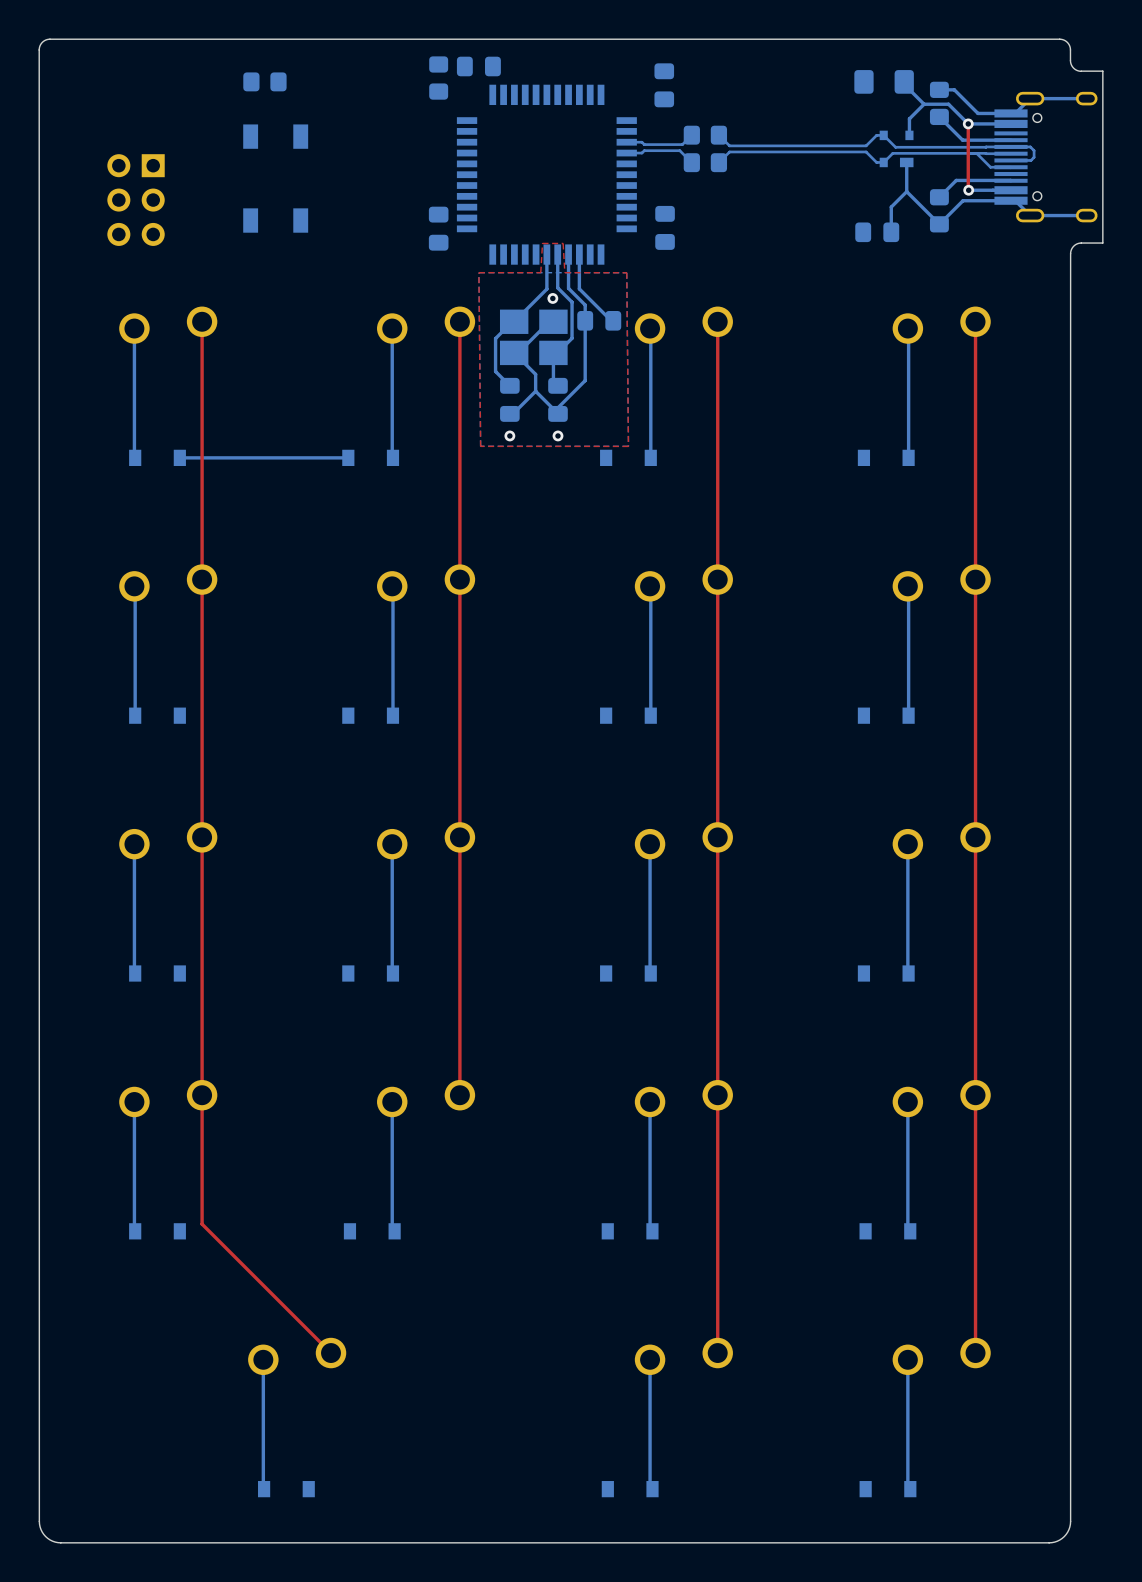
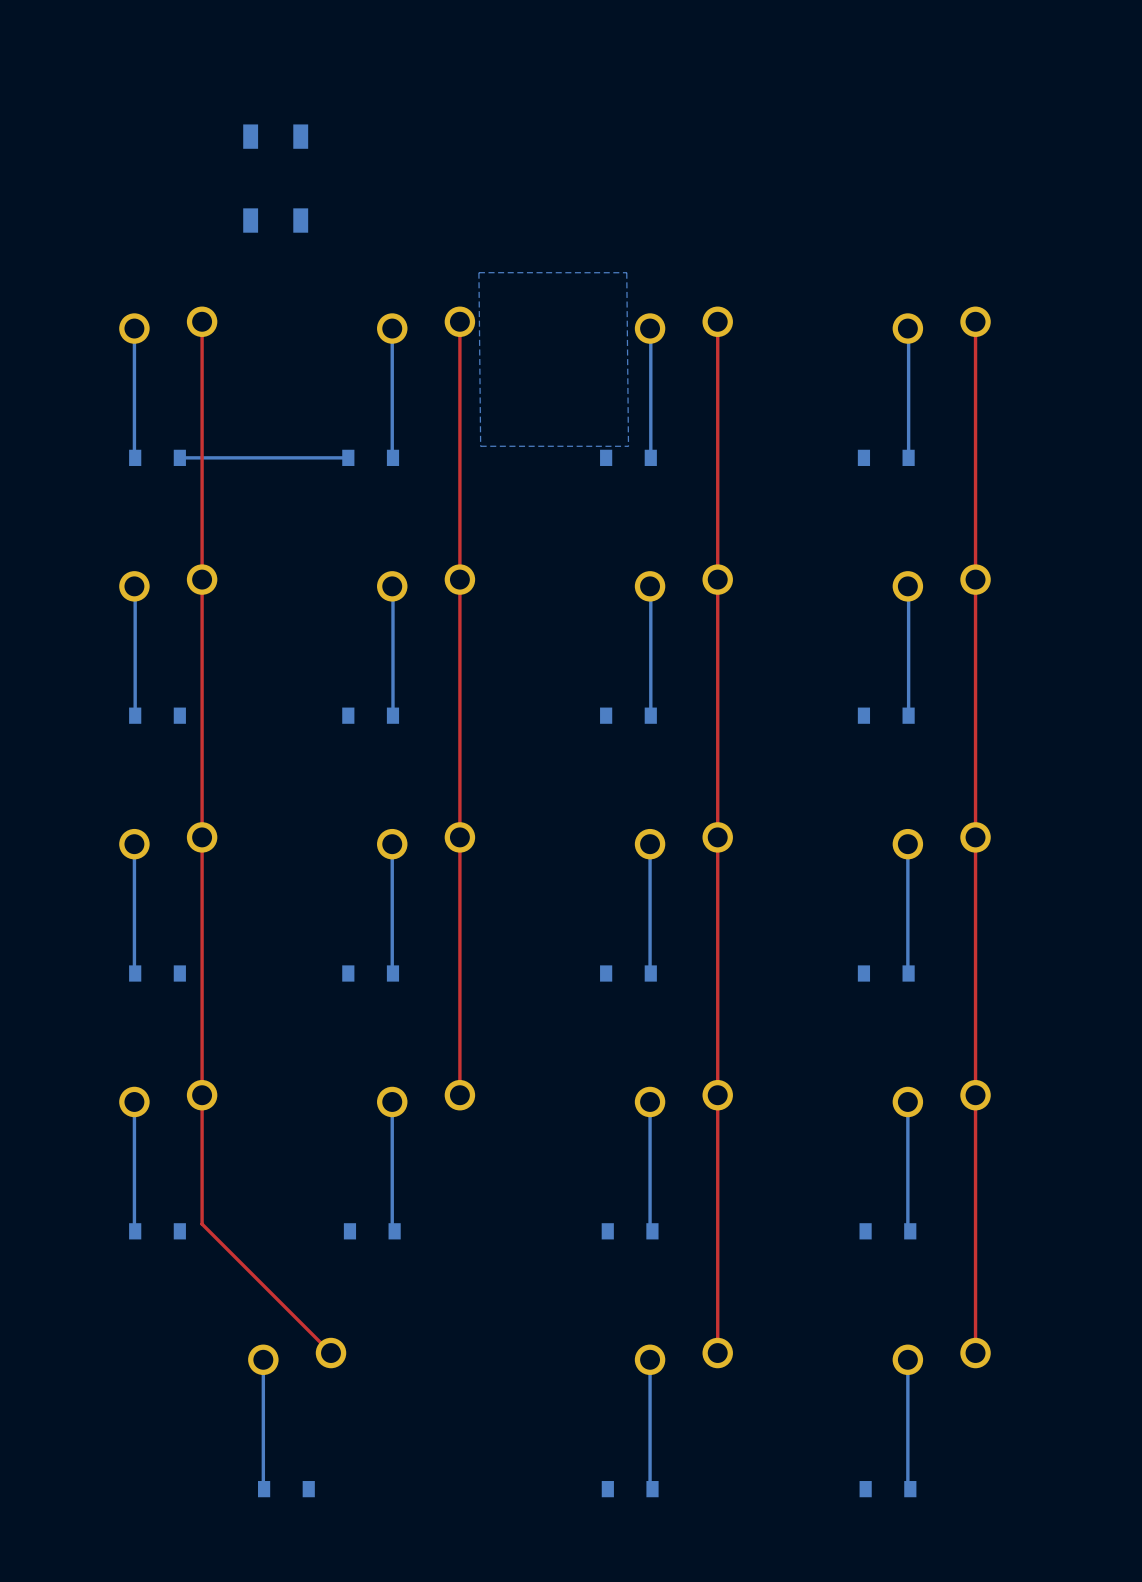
part: (478, 66) -> none
board edge: (1081, 71) (1102, 71) (1102, 243) (1078, 243) (1072, 247) (1070, 253) (1070, 1521) (1066, 1534) (1059, 1539) (1049, 1542) (60, 1542) (47, 1538) (40, 1529) (39, 1521) (39, 49) (41, 43) (49, 39) (1059, 39) (1066, 41) (1069, 45) (1072, 67) (1081, 71) -> none
part: (438, 78) -> none
part: (264, 81) -> none
part: (884, 81) -> none
bottom track: (904, 81) (904, 84) (924, 104) -> none
part: (664, 85) -> none
bottom track: (939, 89) (954, 89) (977, 113) (1015, 113) (1030, 98) (1086, 98) -> none
part: (939, 103) -> none
bottom track: (924, 104) (909, 118) (909, 135) -> none
bottom track: (924, 104) (948, 104) (968, 123) (1011, 123) -> none
bottom track: (939, 116) (962, 140) (1011, 140) -> none
top track: (968, 123) (968, 190) -> none
via: (968, 123) -> none
bottom track: (691, 135) (682, 144) (644, 144) (641, 142) (626, 142) -> none
part: (705, 135) -> none
bottom track: (718, 135) (729, 145) (866, 145) (876, 135) (883, 135) -> none
bottom track: (883, 135) (895, 147) (1030, 146) (1034, 150) (1034, 157) (1030, 160) (1011, 160) -> none
part: (896, 148) -> none
bottom track: (626, 153) (641, 153) (644, 150) (679, 150) (691, 162) -> none
bottom track: (976, 153) (990, 167) (1010, 167) -> none
bottom track: (1011, 153) (892, 153) (883, 162) (876, 162) (866, 151) (729, 151) (718, 162) -> none
part: (1045, 157) -> none
part: (705, 162) -> none
bottom track: (906, 162) (906, 191) -> none
part: (546, 174) -> none
bottom track: (1011, 180) (956, 180) (939, 197) -> none
bottom track: (968, 190) (1011, 190) -> none
via: (968, 190) -> none
bottom track: (906, 191) (891, 207) (891, 232) -> none
bottom track: (906, 191) (939, 224) (963, 200) (1015, 200) (1030, 215) (1086, 215) -> none
part: (136, 200) -> none
part: (939, 210) -> none
part: (665, 227) -> none
part: (438, 228) -> none
part: (877, 232) -> none
top zone outline: (542, 243) (540, 272) (478, 272) (480, 446) (628, 446) (626, 272) (564, 272) (563, 243) (542, 243) -> none
bottom track: (546, 254) (546, 289) (495, 338) (495, 371) (509, 385) -> none
bottom track: (557, 254) (557, 287) (572, 302) (572, 338) (557, 352) (553, 352) (553, 381) (557, 385) -> none
bottom track: (568, 254) (568, 288) (585, 305) (585, 380) (557, 407) (557, 413) -> none
bottom track: (579, 254) (579, 288) (613, 320) -> none
via: (552, 298) -> none
part: (599, 320) -> none
bottom track: (553, 321) (549, 321) (518, 352) (514, 352) (535, 374) (535, 391) -> none
part: (533, 337) -> none
bottom track: (535, 391) (513, 413) (509, 413) -> none
bottom track: (535, 391) (557, 413) -> none
part: (509, 399) -> none
part: (557, 399) -> none
via: (509, 435) -> none
via: (557, 435) -> none

